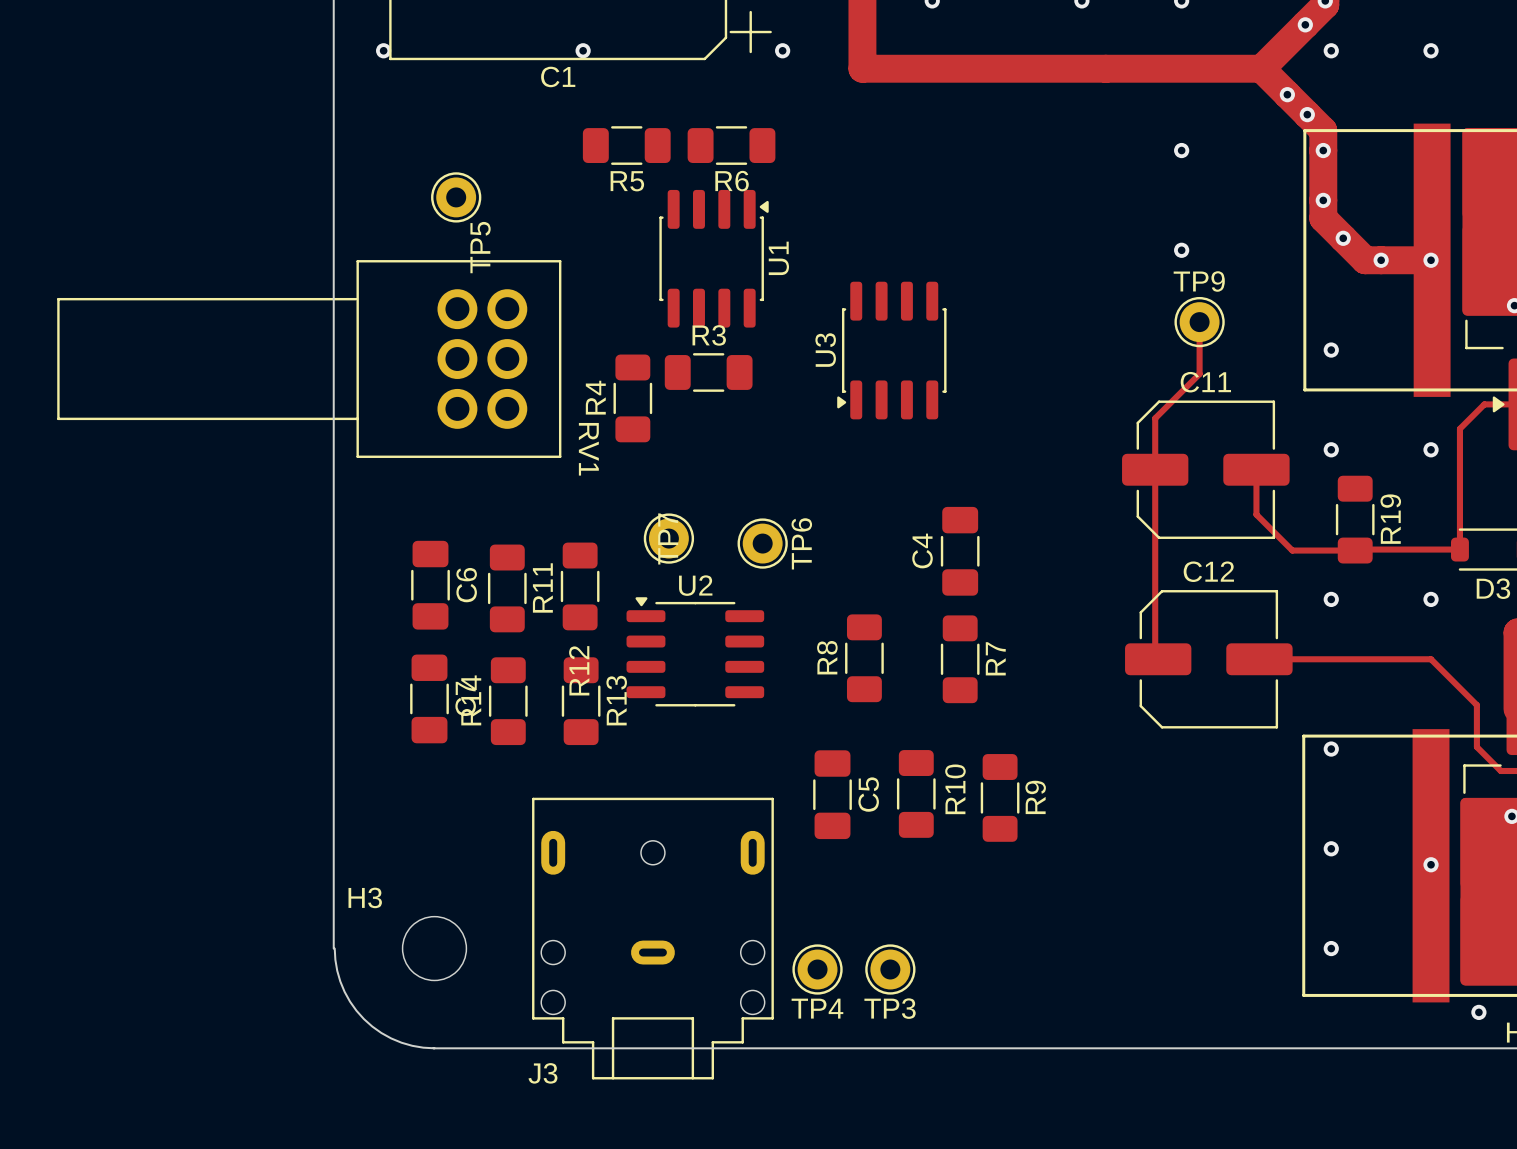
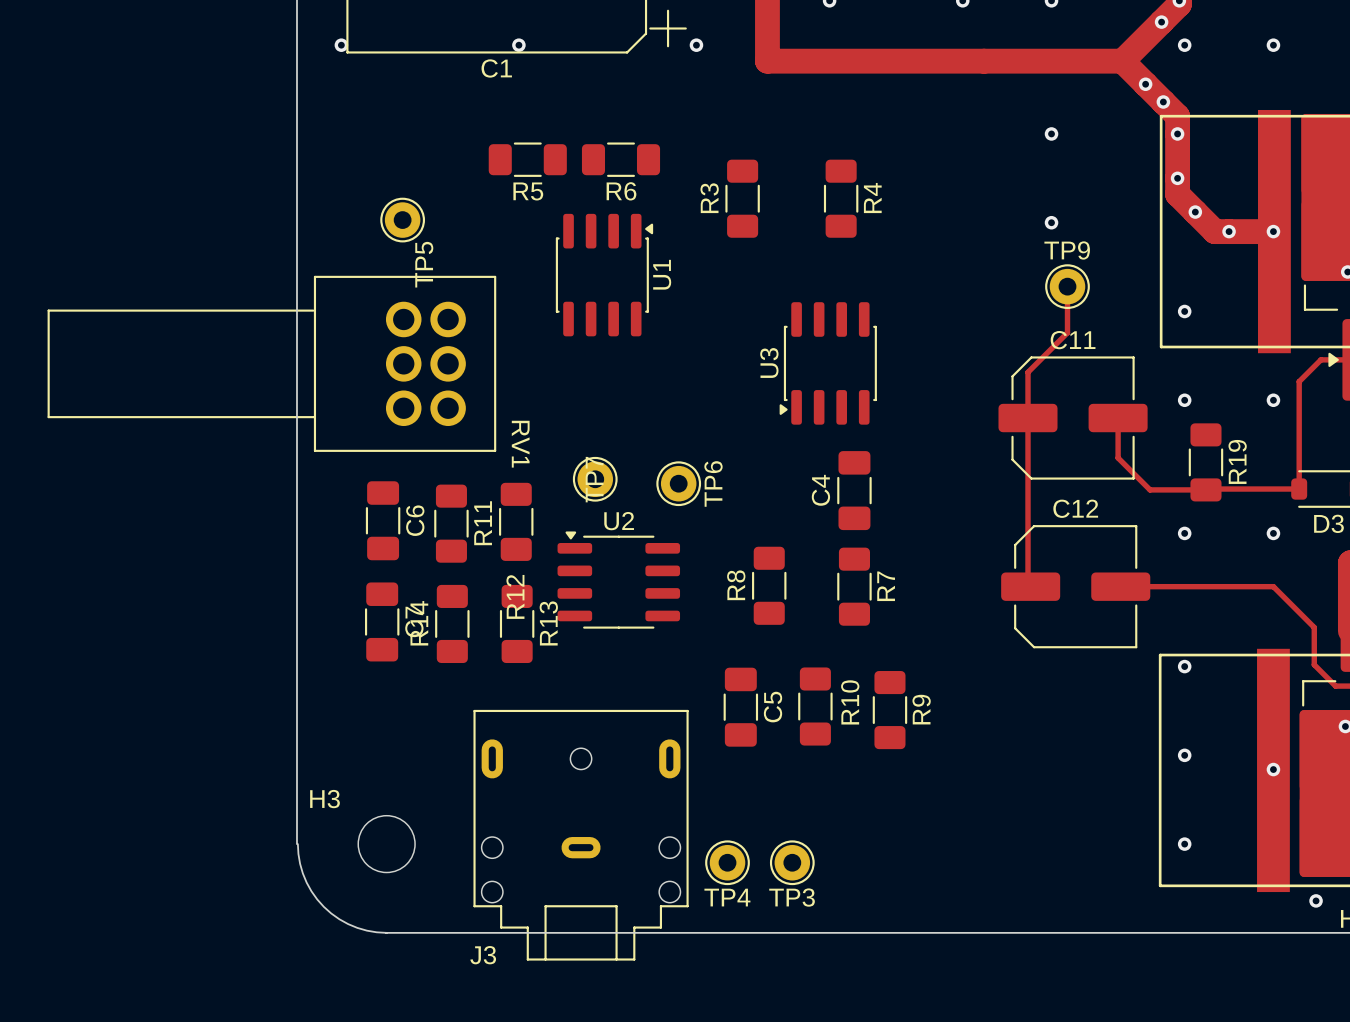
R5 position: (626, 145) -> (527, 159)
R6 position: (731, 145) -> (620, 159)
TP5 position: (456, 197) -> (402, 220)
U1 position: (714, 258) -> (604, 275)
R3 name position: R3 (709, 335) -> R3 (709, 198)
U3 position: (891, 350) -> (828, 363)
RV1 position: (309, 359) -> (271, 363)
R3 rotation: 0° (708, 372) -> 90° clockwise (742, 198)
R3 position: (708, 372) -> (742, 198)
R4 name position: R4 (595, 397) -> R4 (872, 198)
R4 position: (632, 398) -> (841, 198)

